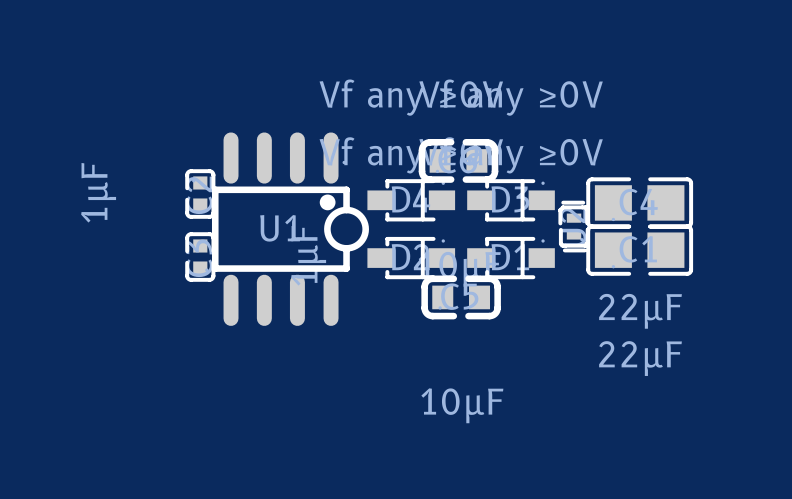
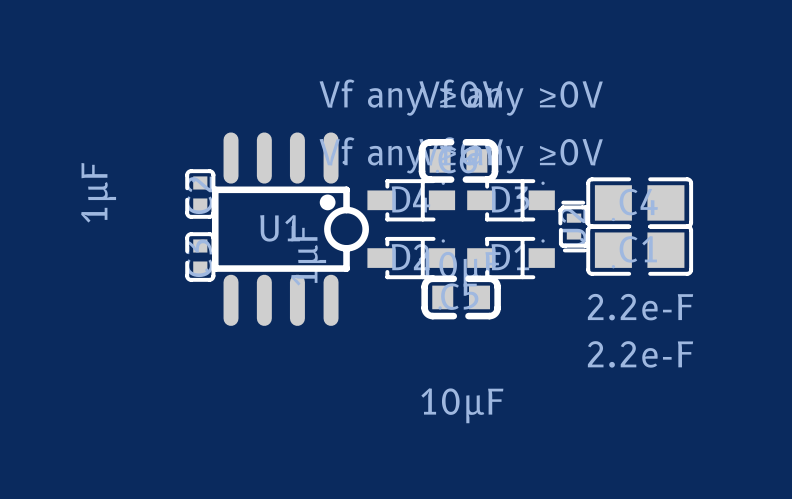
part value: 22µF (640, 311) -> 2.2e-F (640, 307)
part value: 22µF (640, 358) -> 2.2e-F (640, 354)

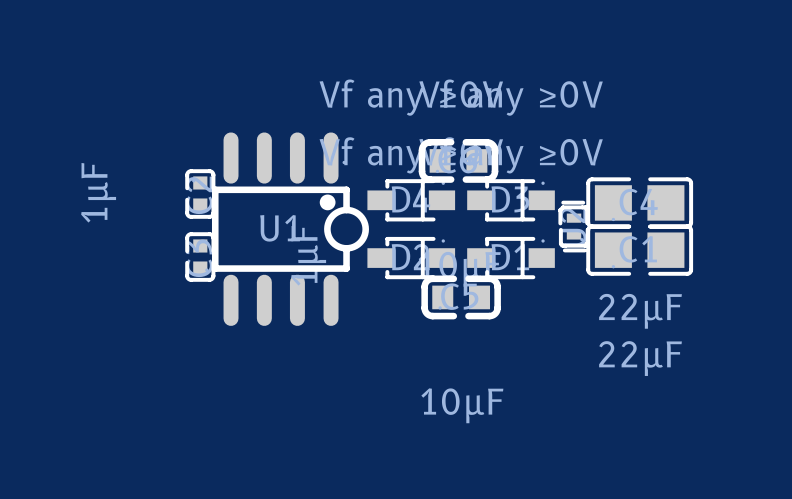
part value: 2.2e-F (640, 307) -> 22µF (640, 311)
part value: 2.2e-F (640, 354) -> 22µF (640, 358)

